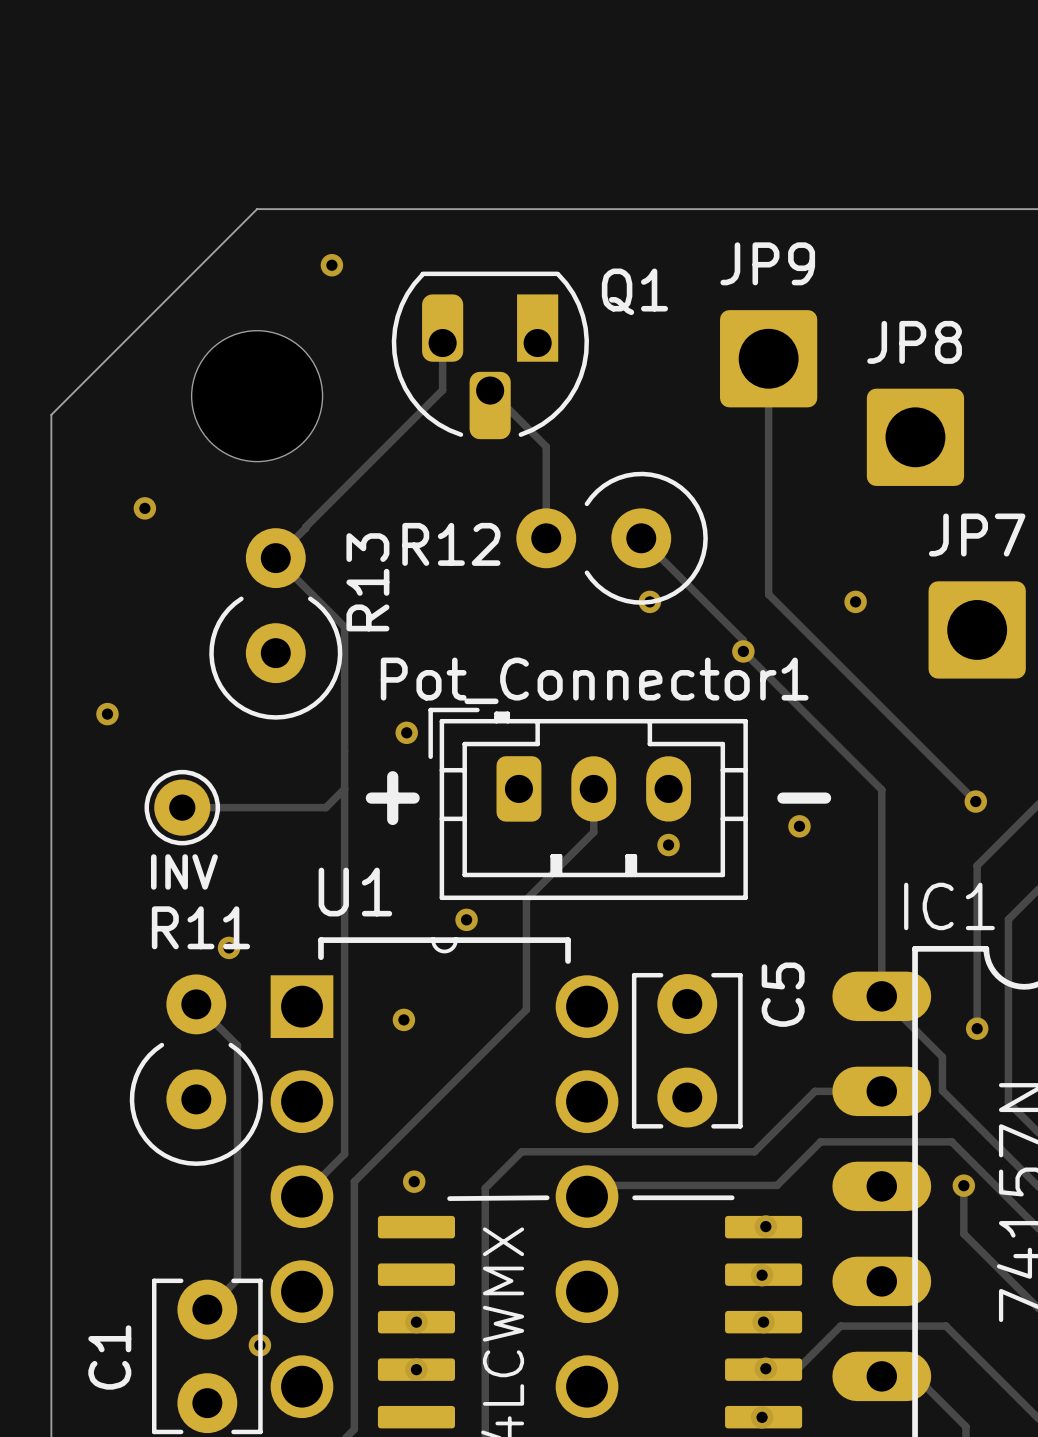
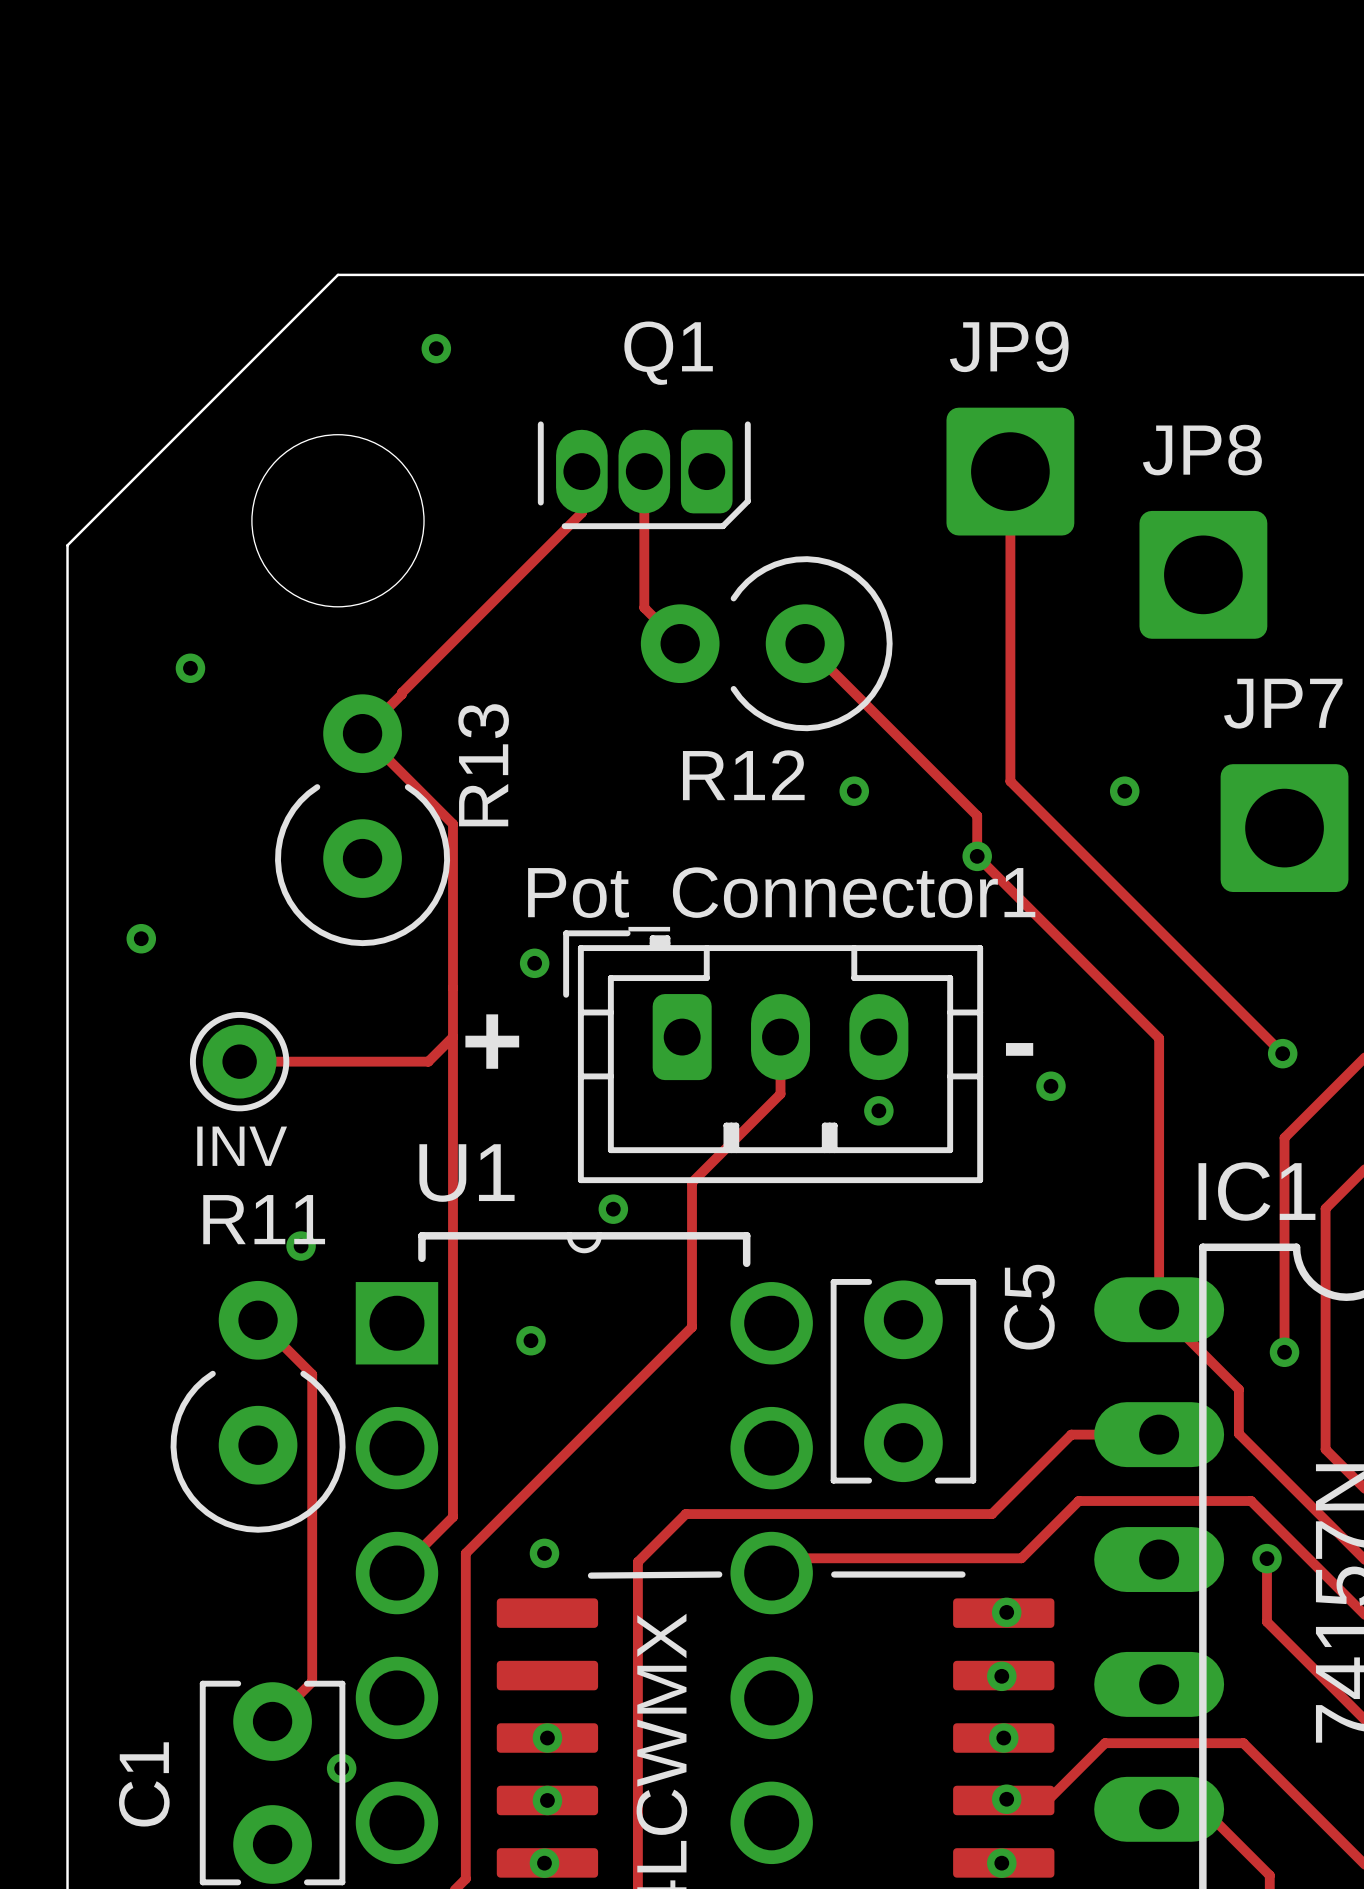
Q1 footprint: [391, 271, 589, 440] -> [537, 421, 751, 530]
Q1 name position: Q1 (634, 291) -> Q1 (668, 353)
track: none -> (644, 471) (644, 607) (680, 643)
track: (490, 390) (546, 446) (546, 538) -> none
R12 position: (612, 538) -> (766, 643)
track: (641, 538) (743, 640) -> (805, 643) (977, 815) (977, 841)
R12 name position: R12 (451, 544) -> R12 (743, 775)
via: none -> (544, 1863)

